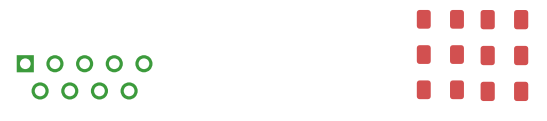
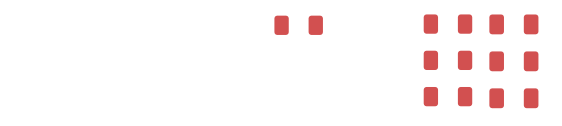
part: none -> (298, 25)
part: (84, 77) -> none

